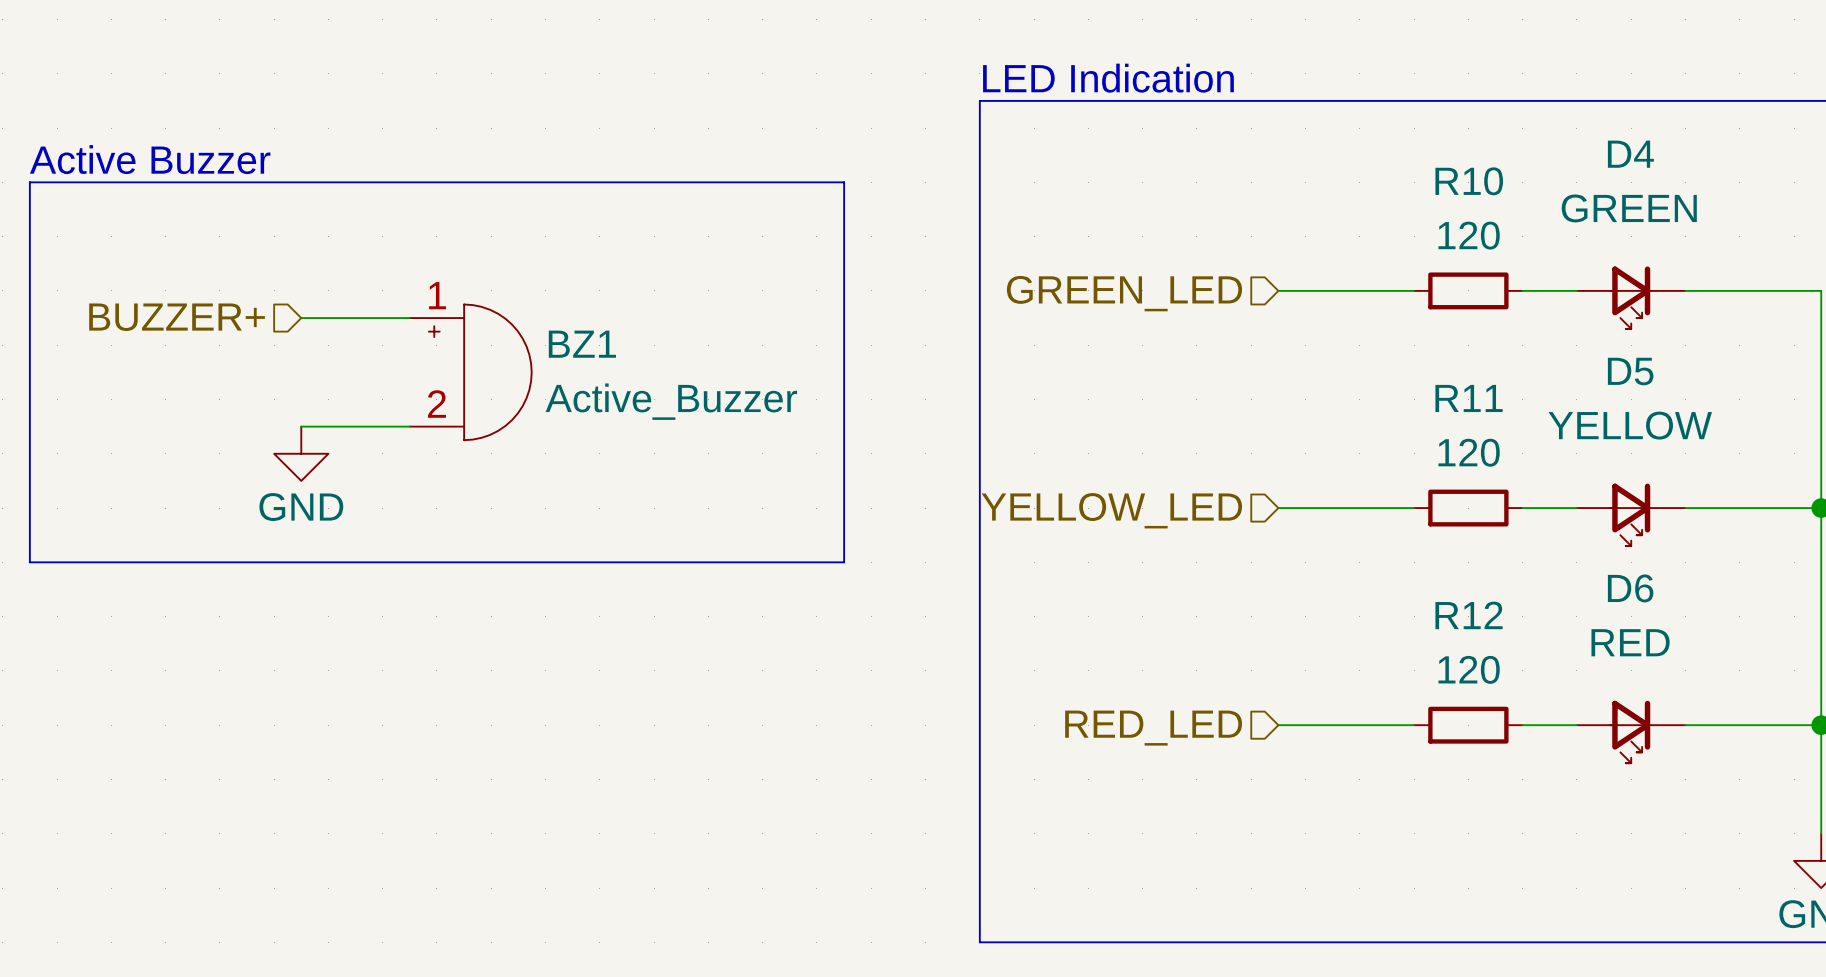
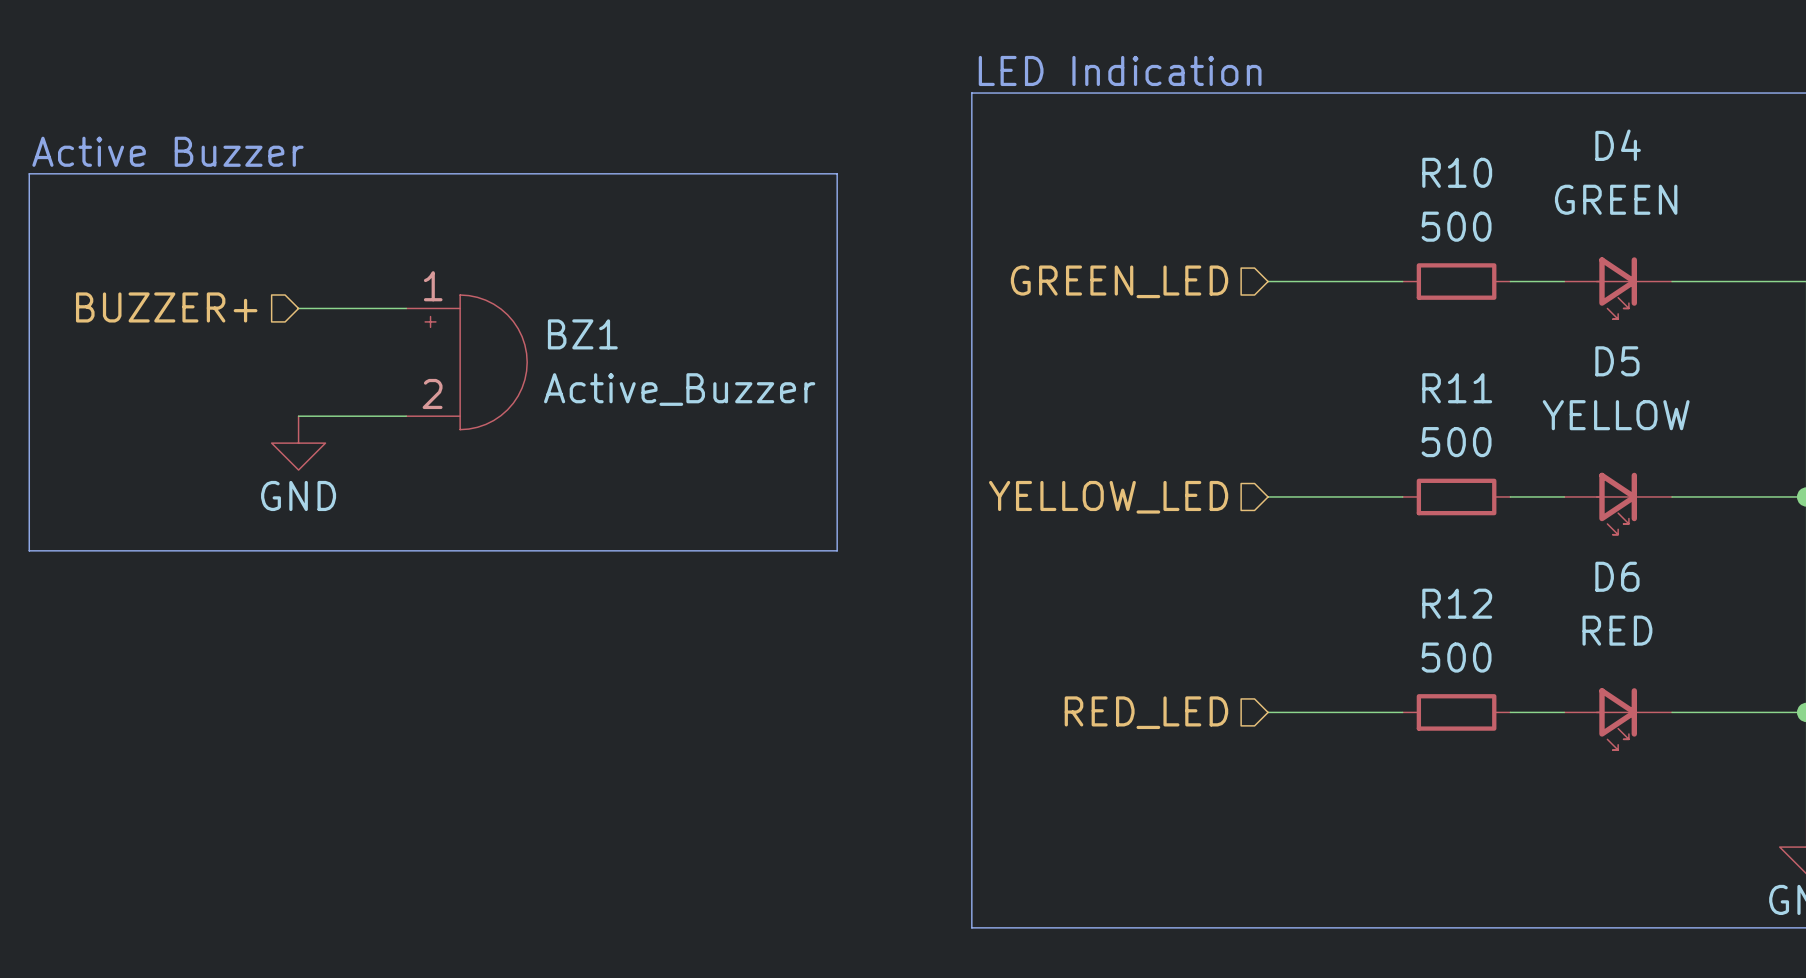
R10 value: 120 (1469, 235) -> 500 (1456, 226)
R11 value: 120 (1469, 452) -> 500 (1456, 442)
R12 value: 120 (1469, 669) -> 500 (1456, 657)

